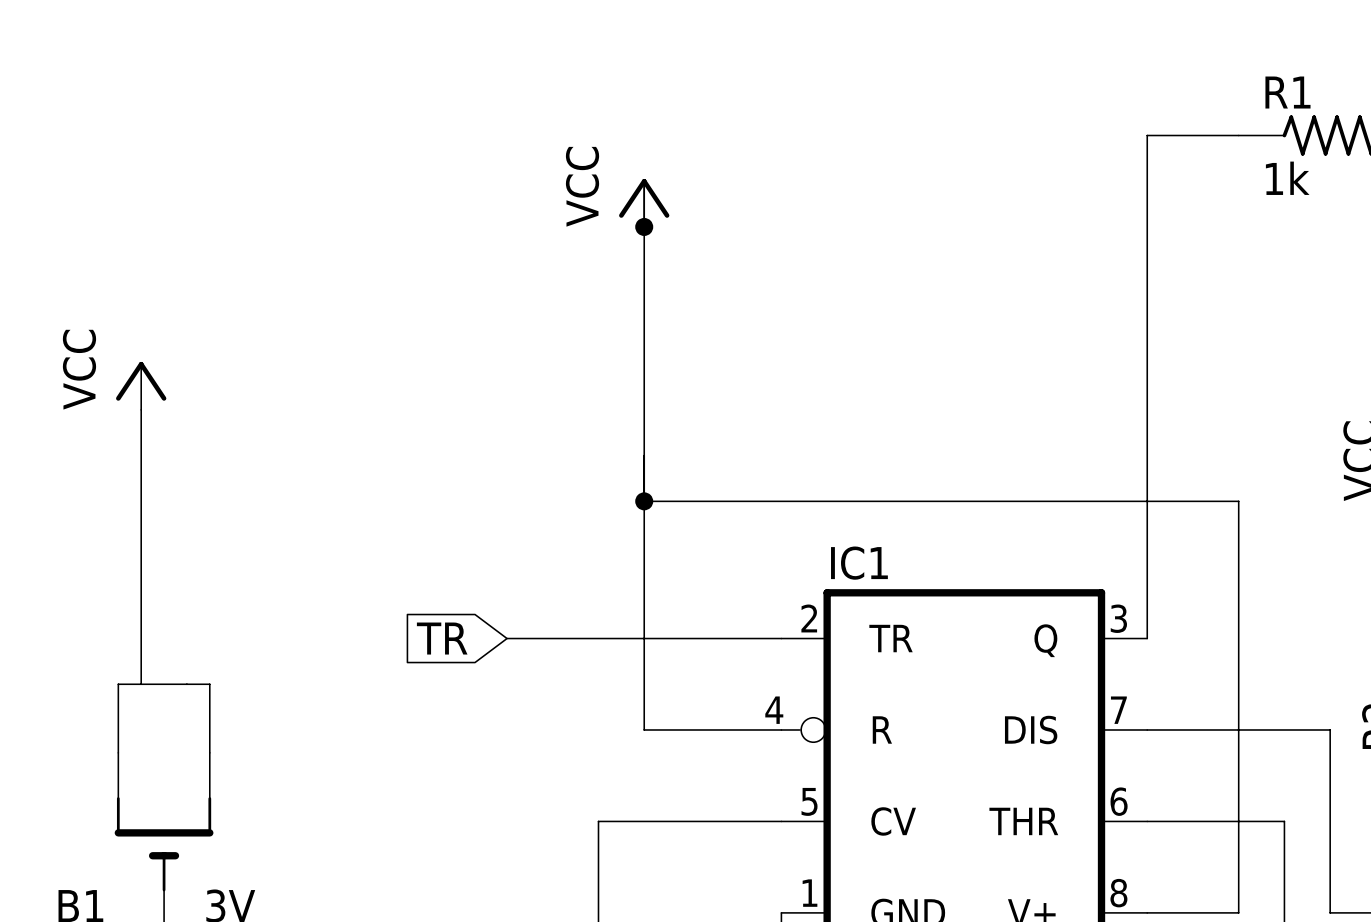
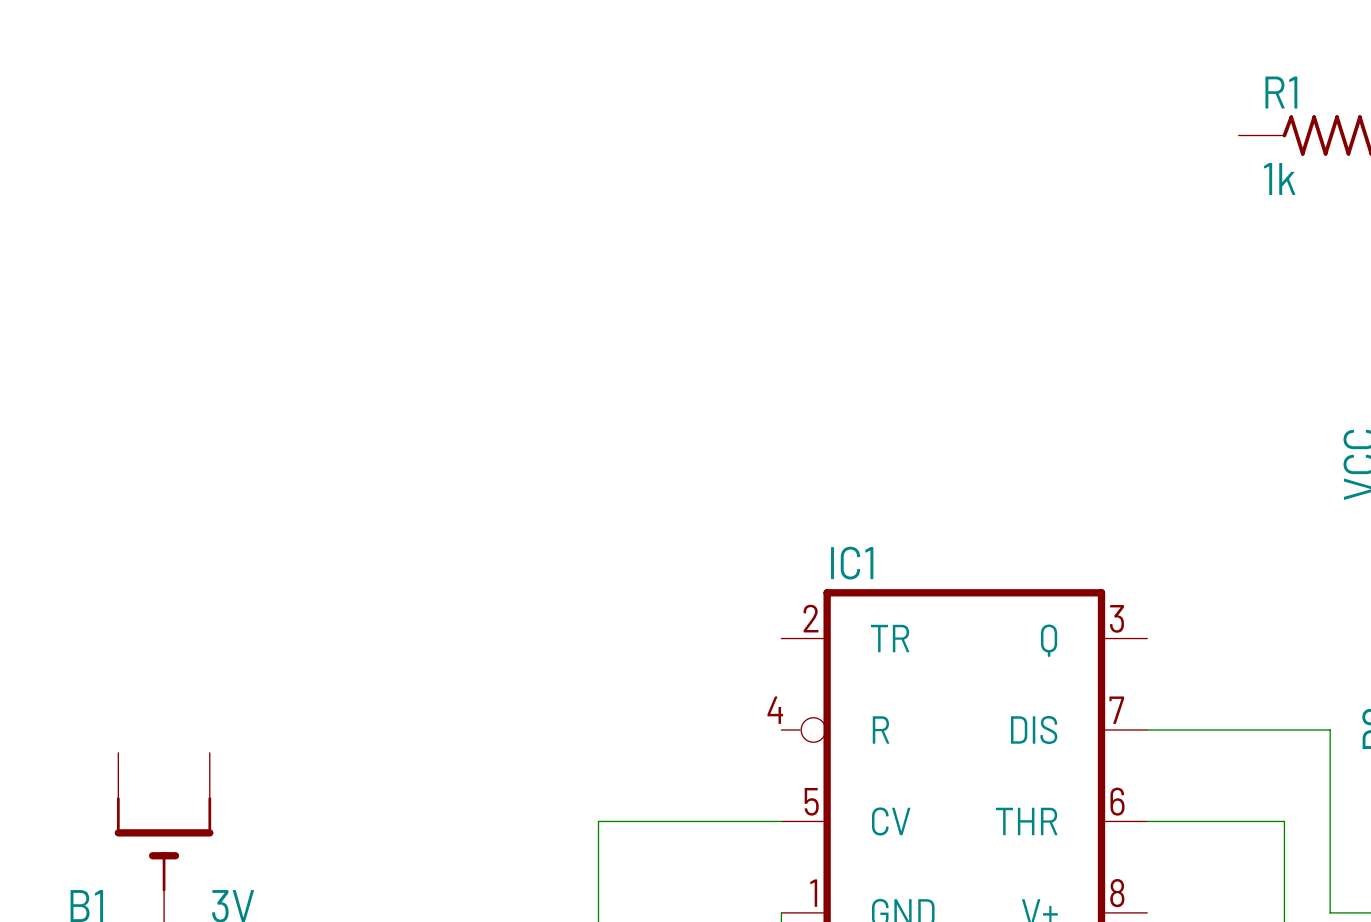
wire: (1238, 135) (1147, 135) (1147, 638) -> none
wire: (644, 181) (644, 729) (781, 729) -> none
power symbol: VCC (644, 202) -> none
junction: (644, 226) -> none
power symbol: VCC (141, 385) -> none
wire: (141, 409) (141, 684) -> none
wire: (644, 501) (1238, 501) (1238, 912) (1147, 912) -> none
junction: (644, 501) -> none
global label: TR (442, 638) -> none
wire: (507, 638) (781, 638) -> none
wire: (118, 752) (118, 684) (209, 684) (209, 752) -> none

